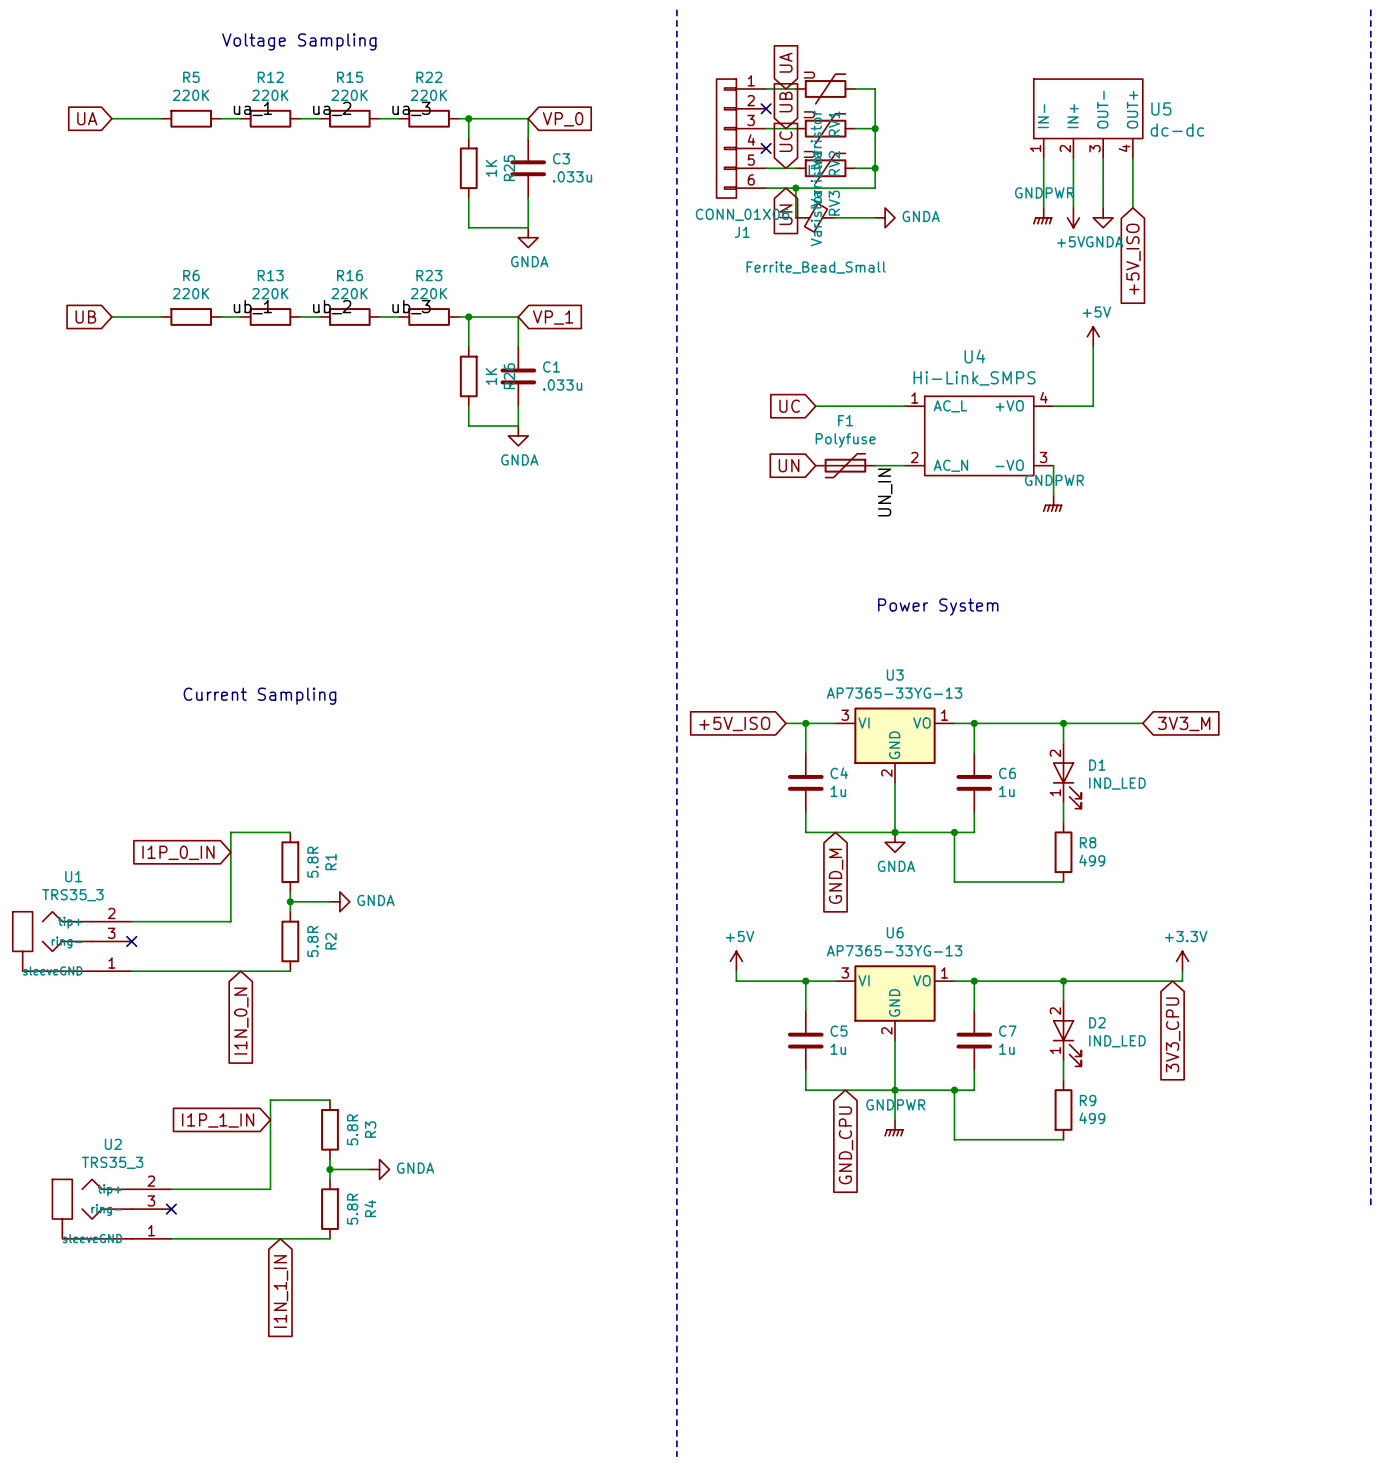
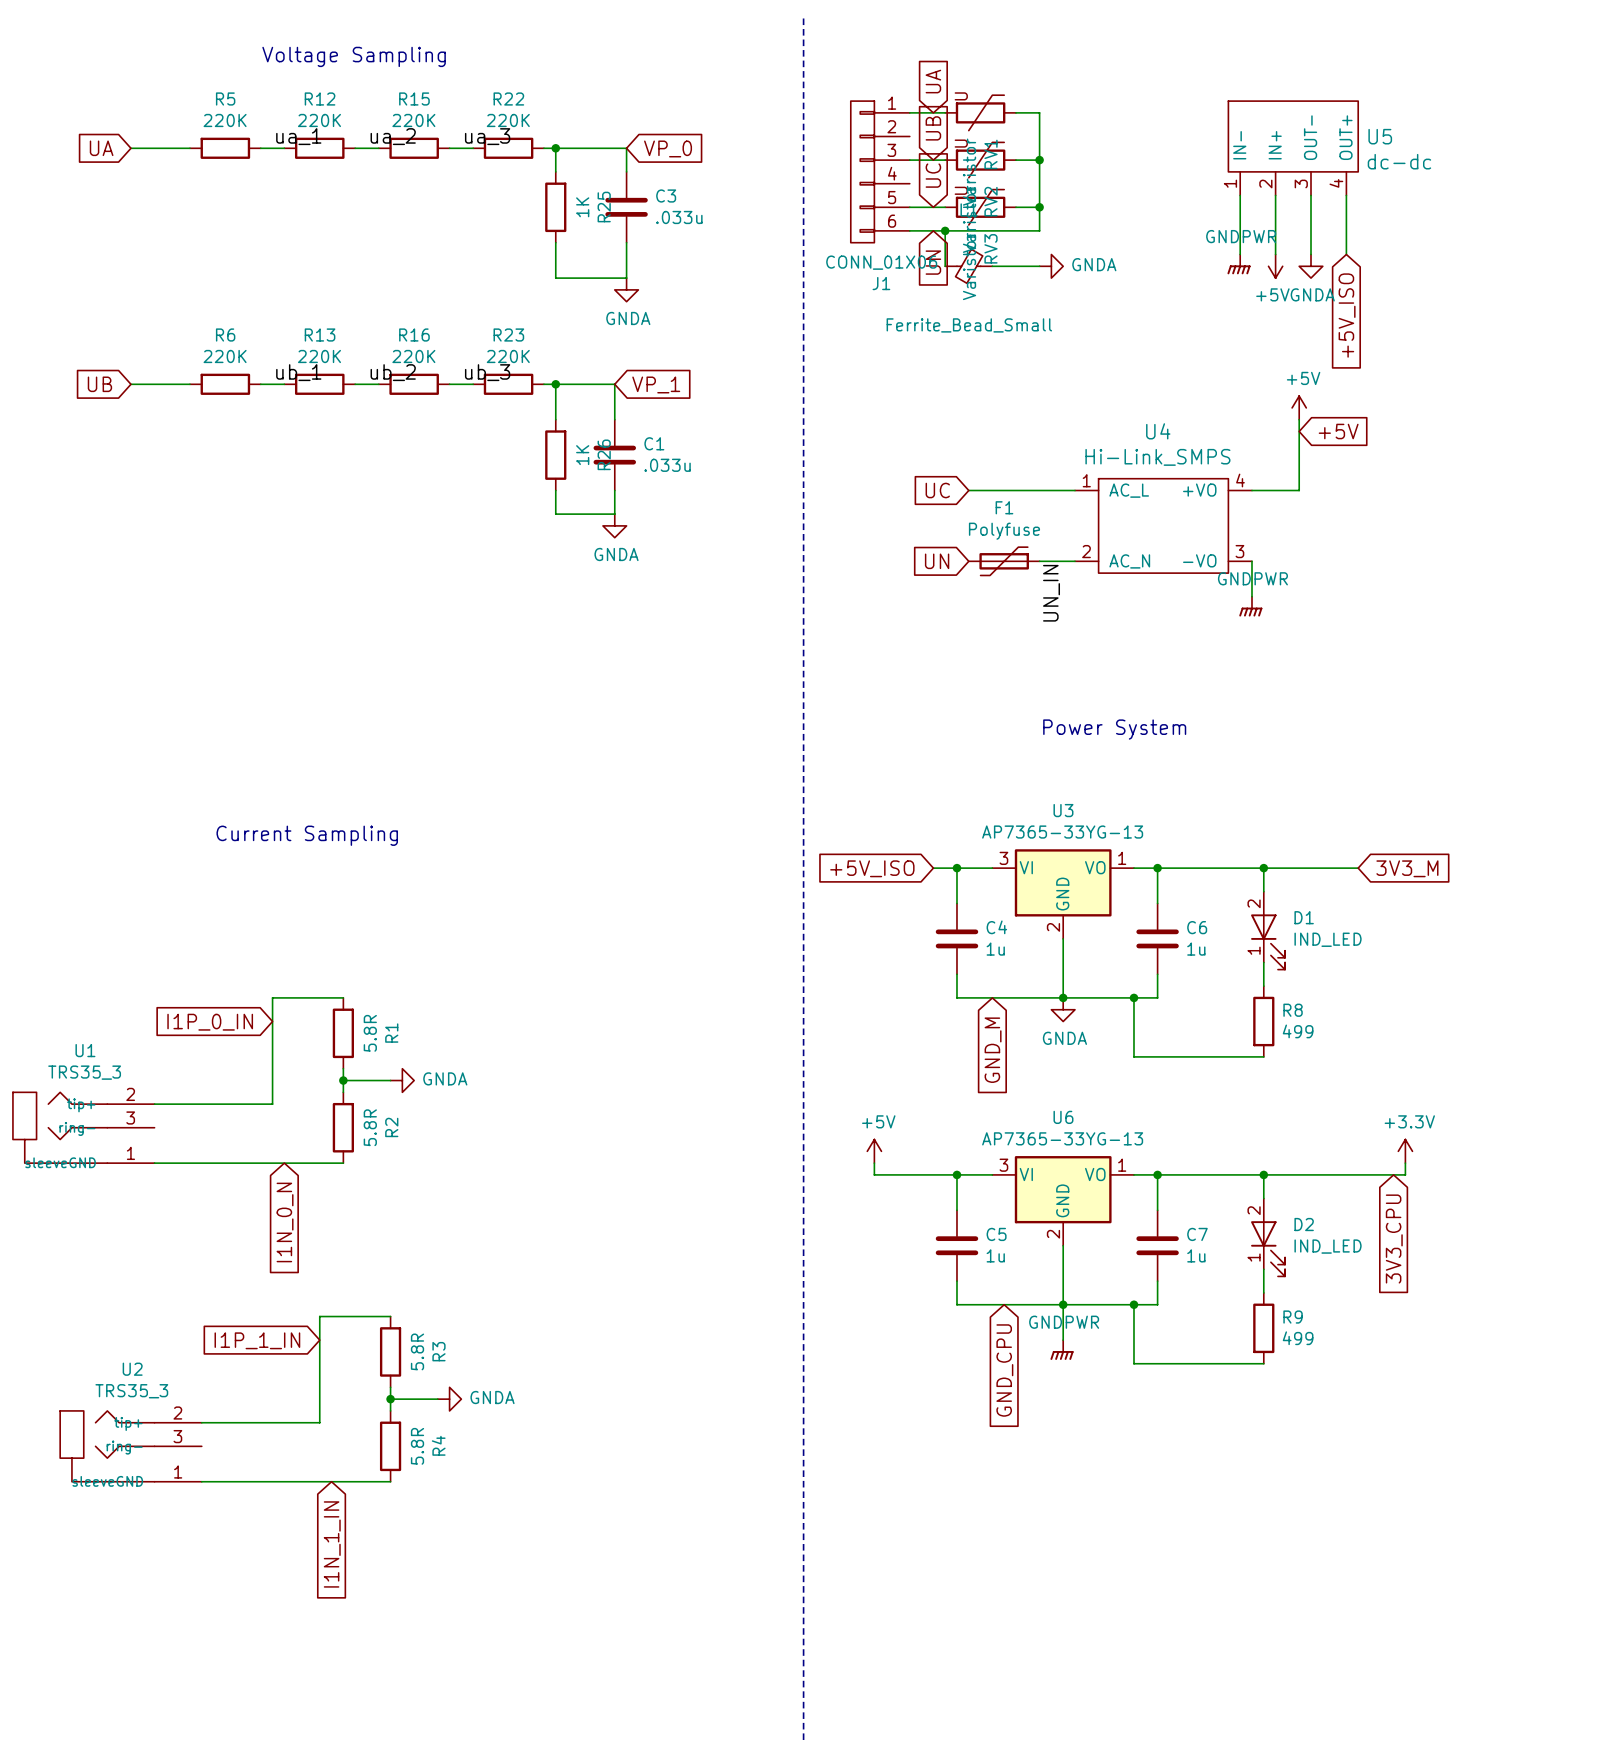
no-connect mark: (766, 108) -> none
no-connect mark: (766, 148) -> none
global label: none -> +5V (1338, 431)
no-connect mark: (131, 941) -> none
no-connect mark: (171, 1209) -> none

